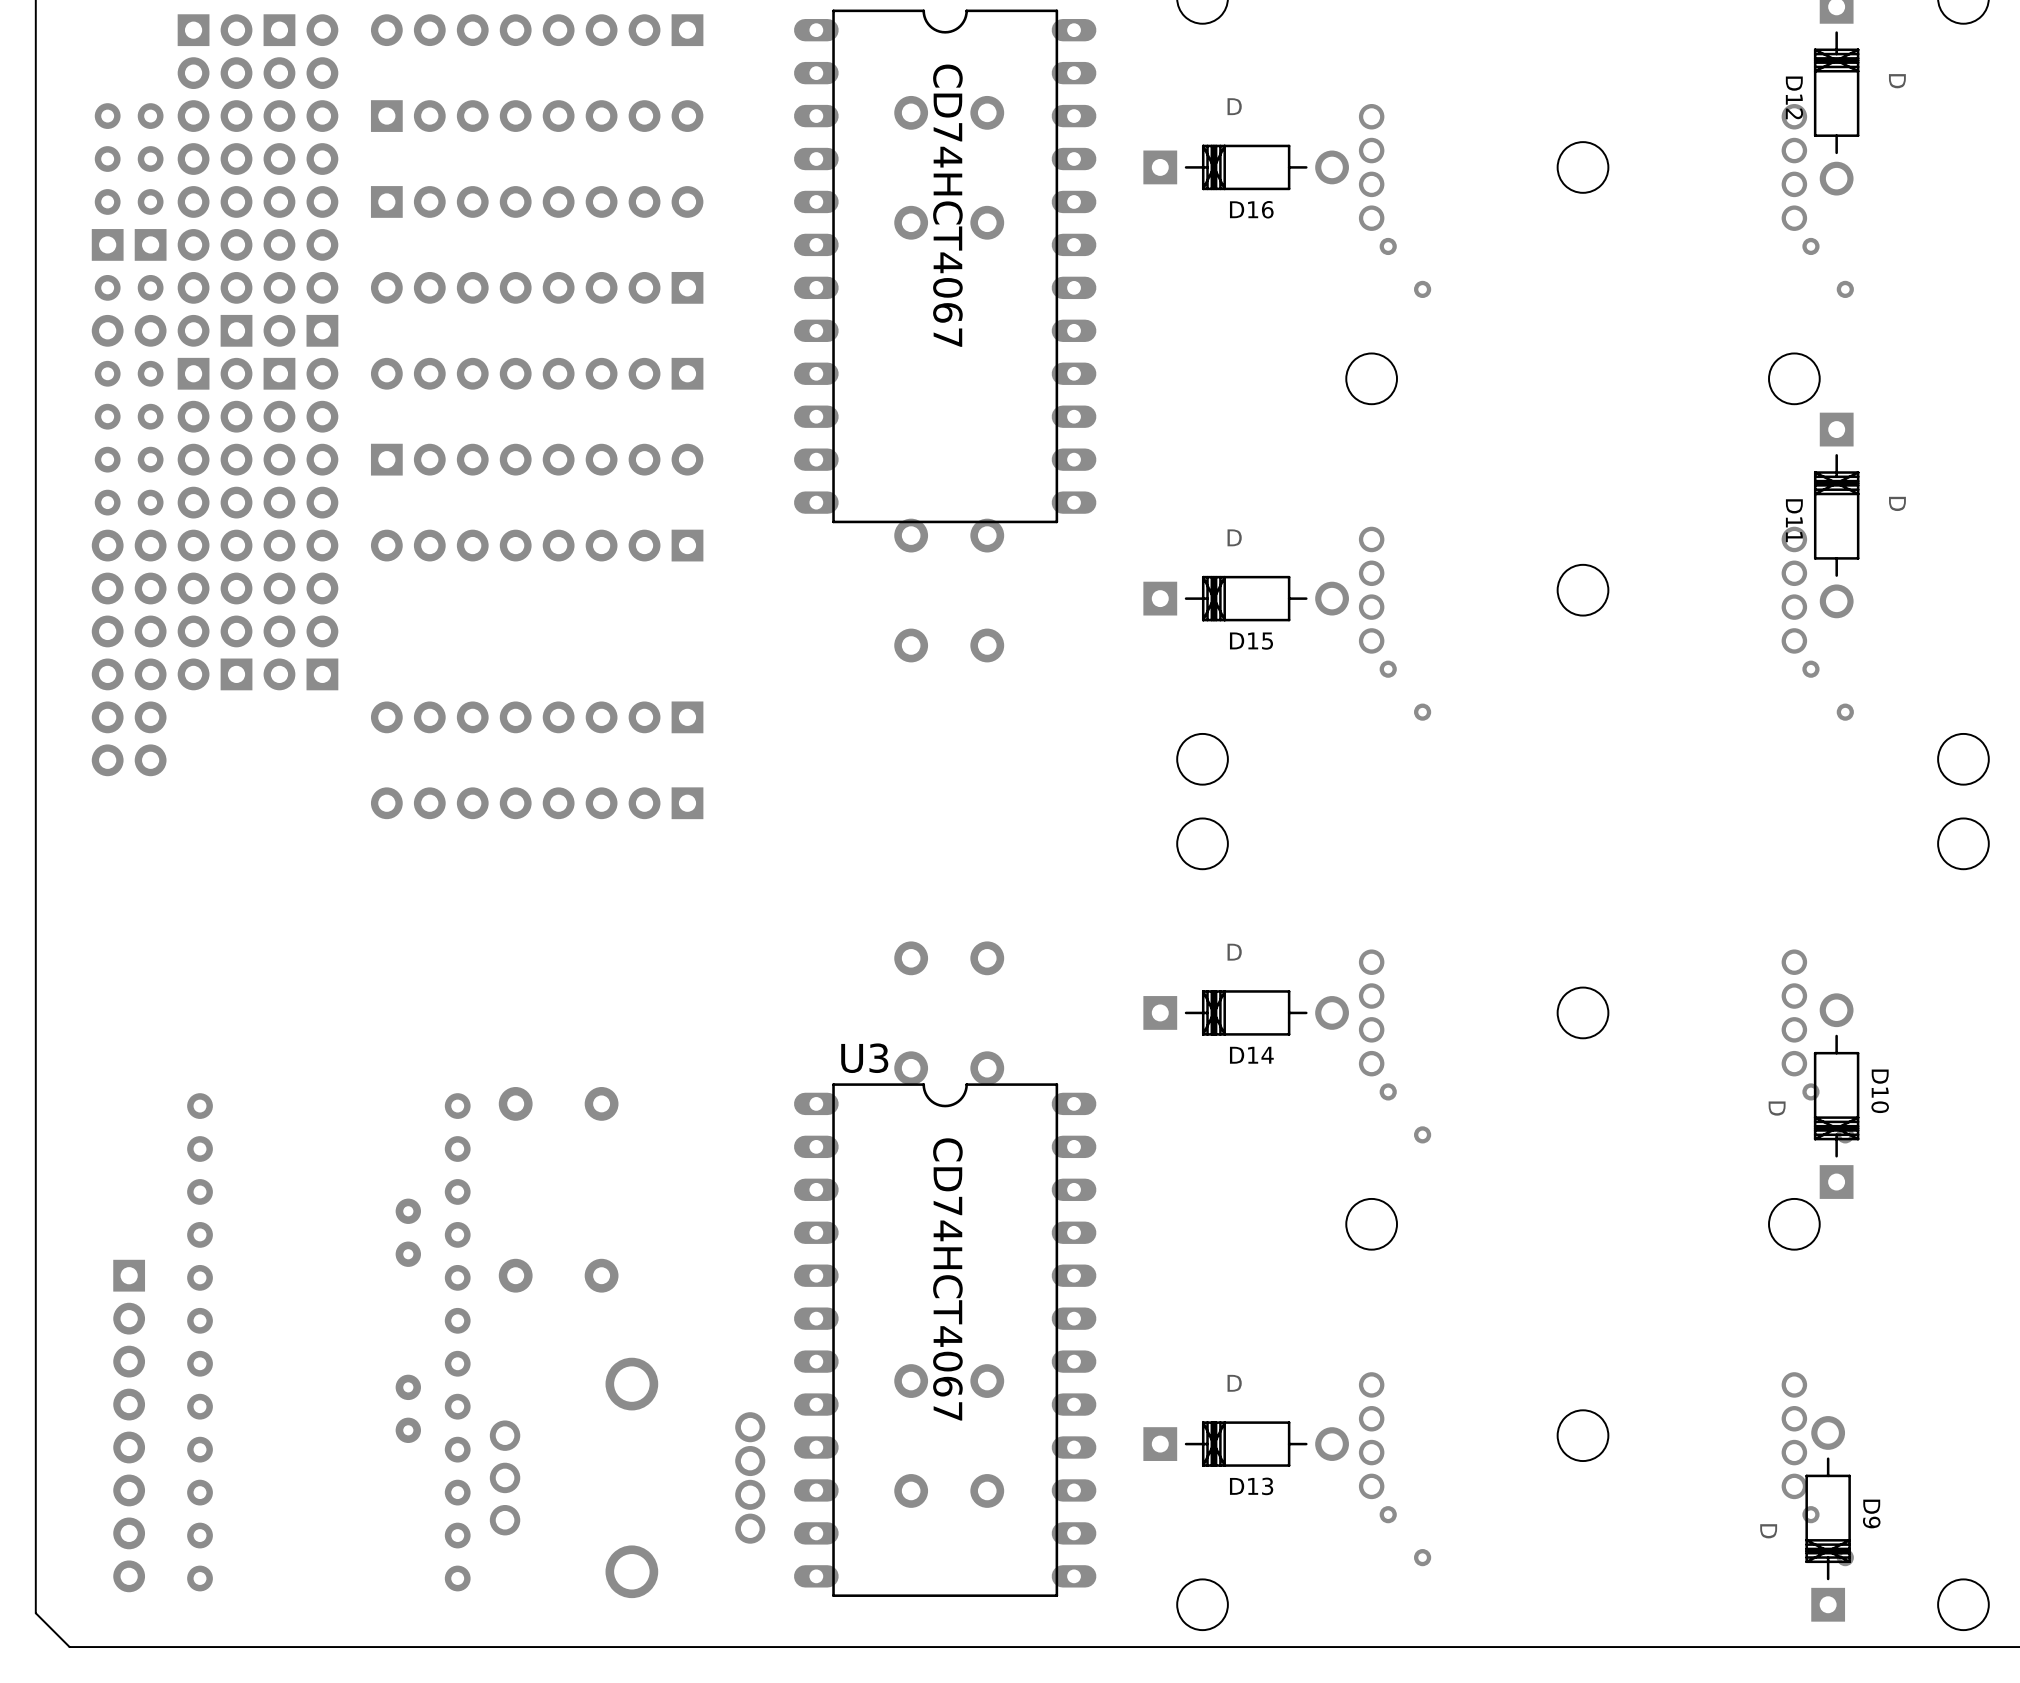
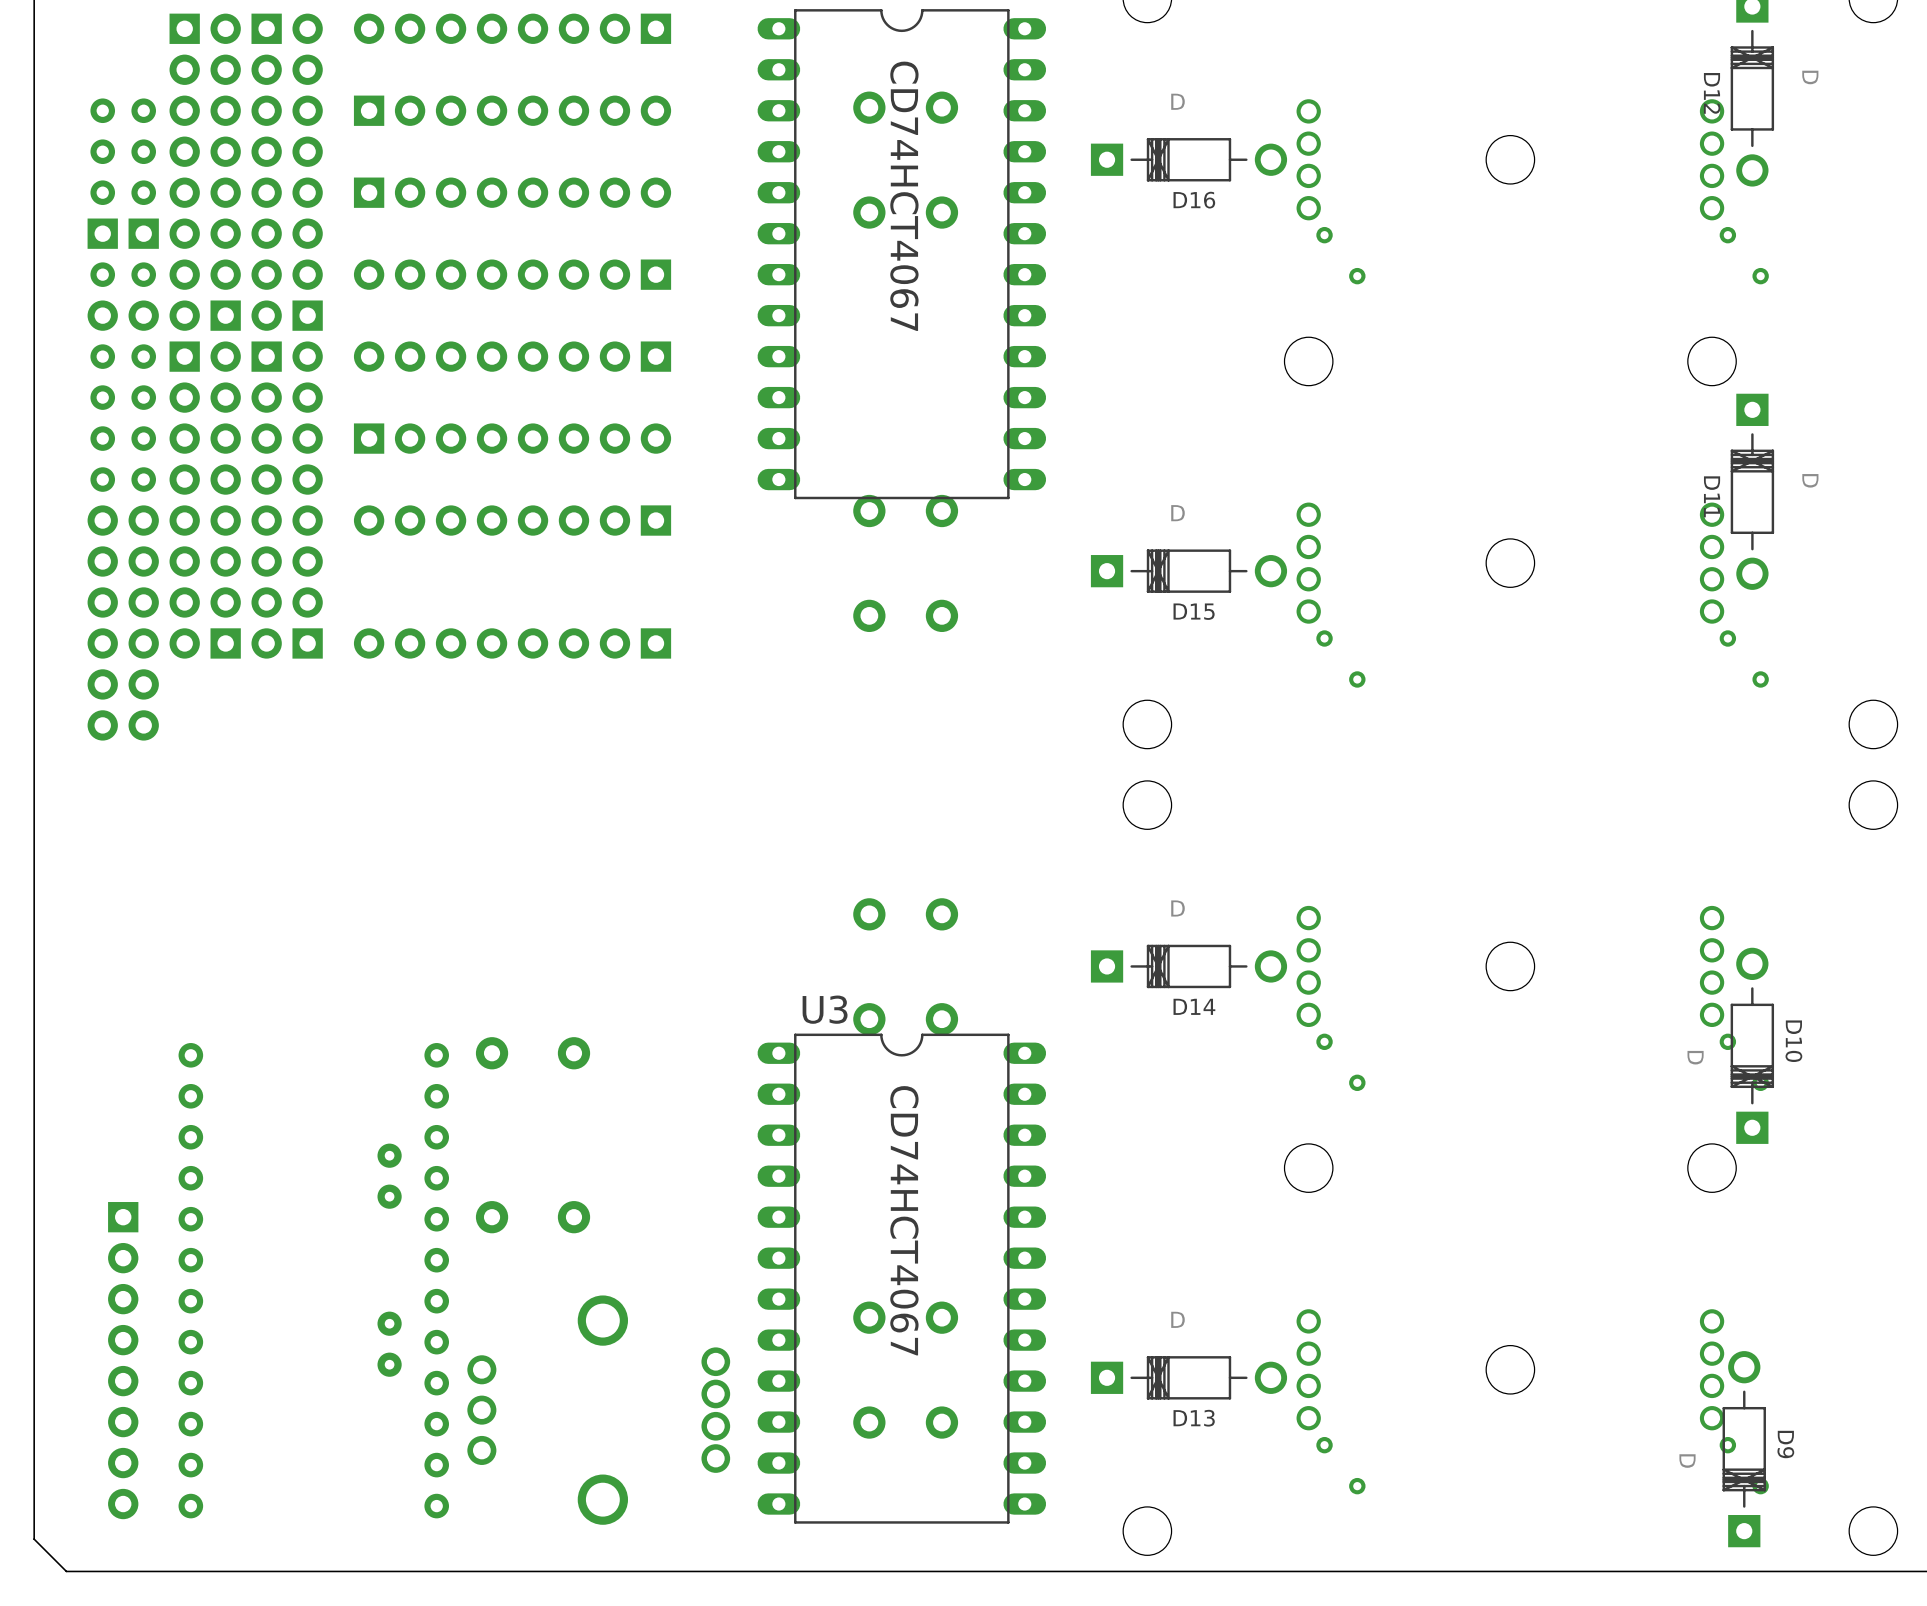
part position: (537, 717) -> (512, 643)
part: (537, 803) -> none

